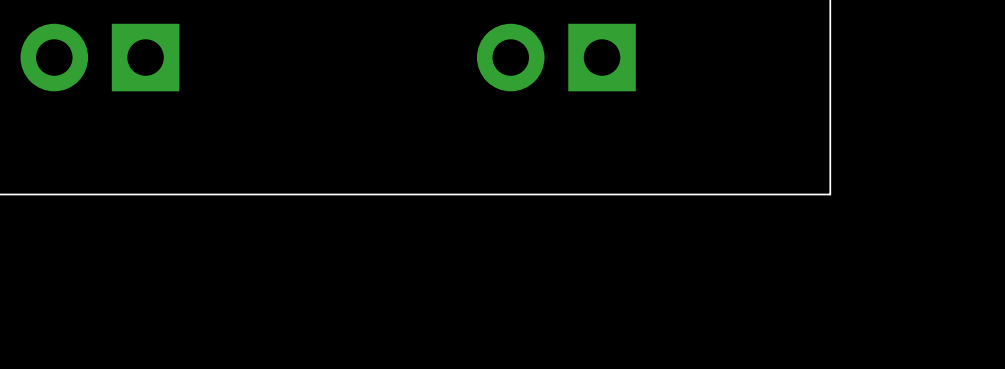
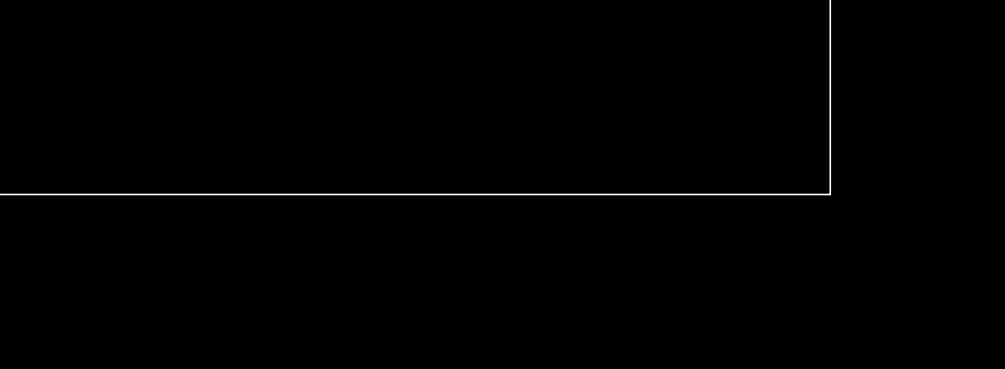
part: (99, 57) -> none
part: (556, 57) -> none

